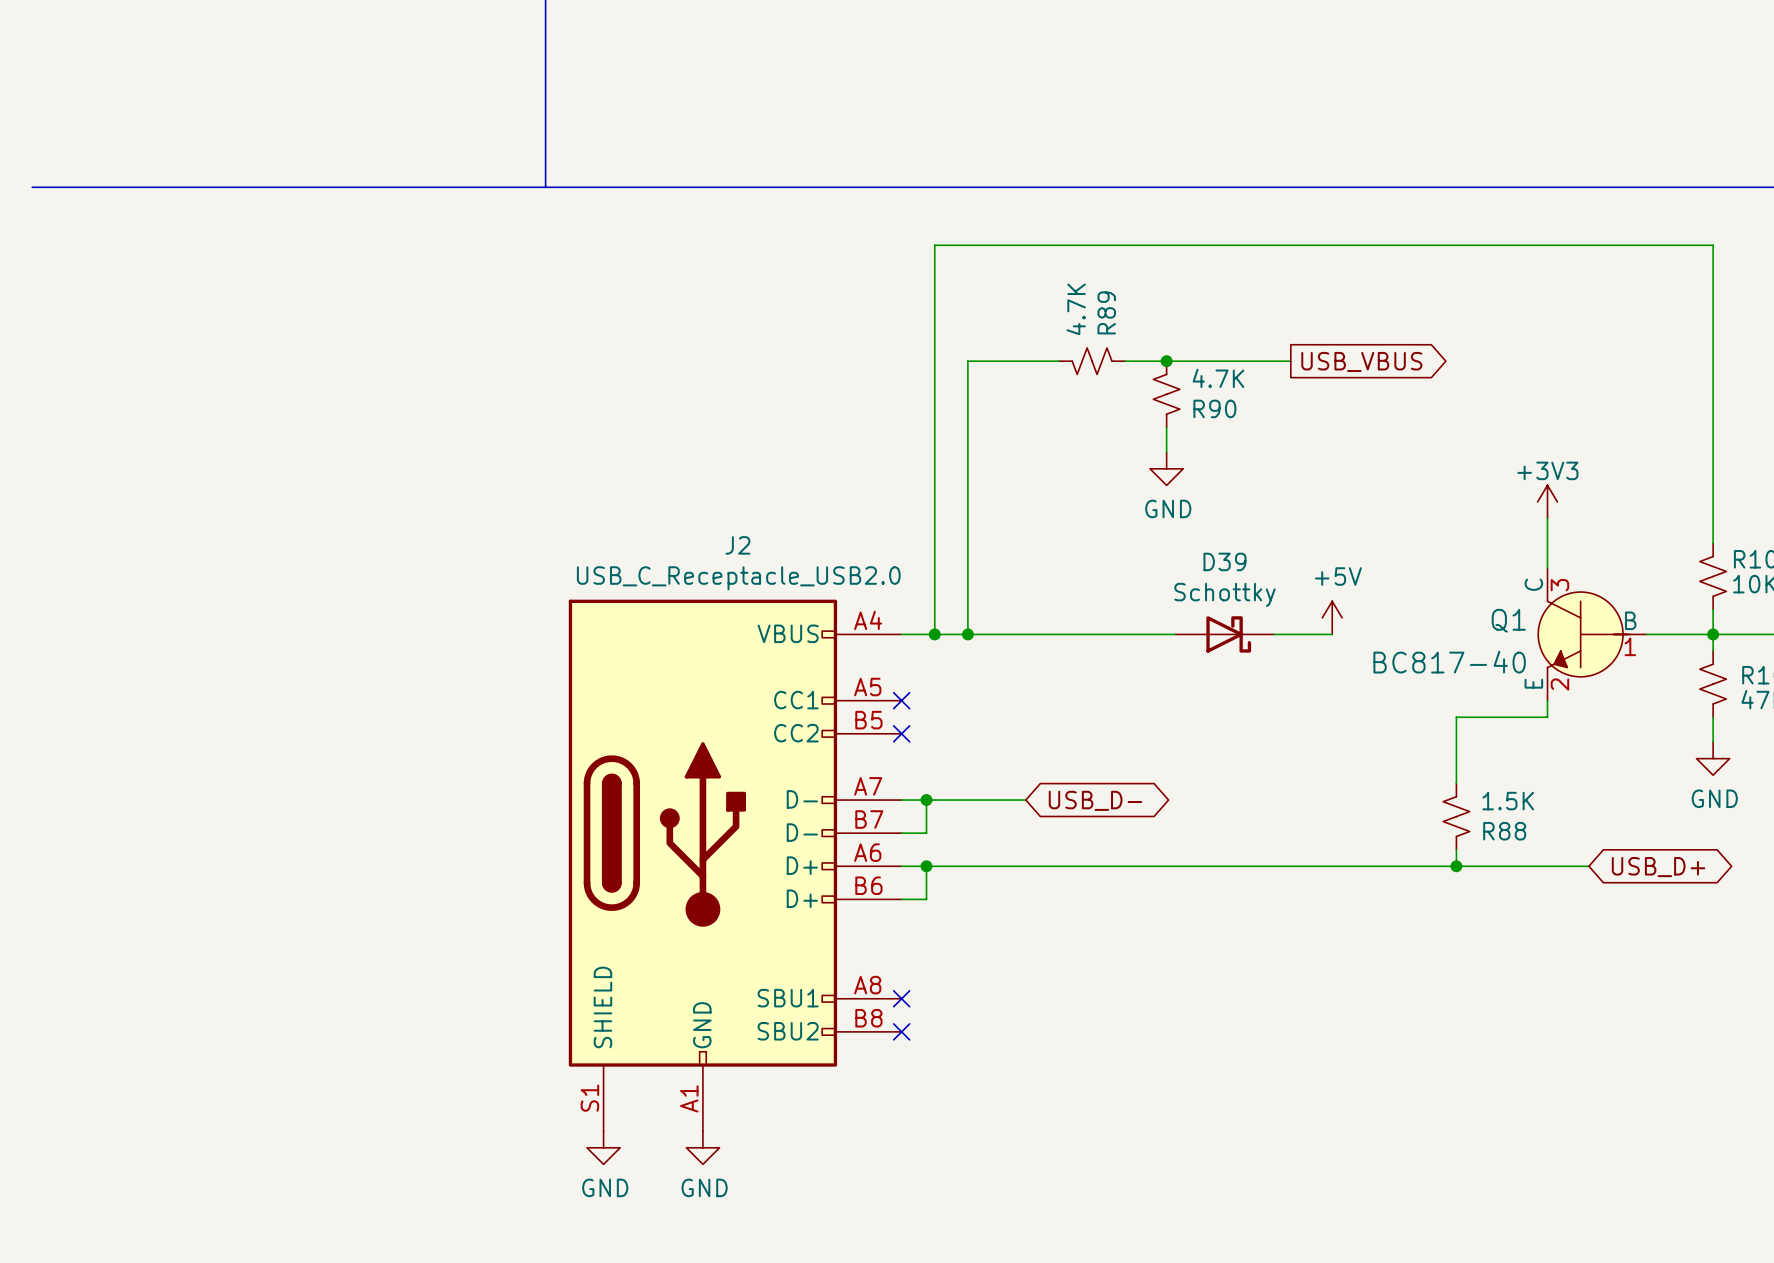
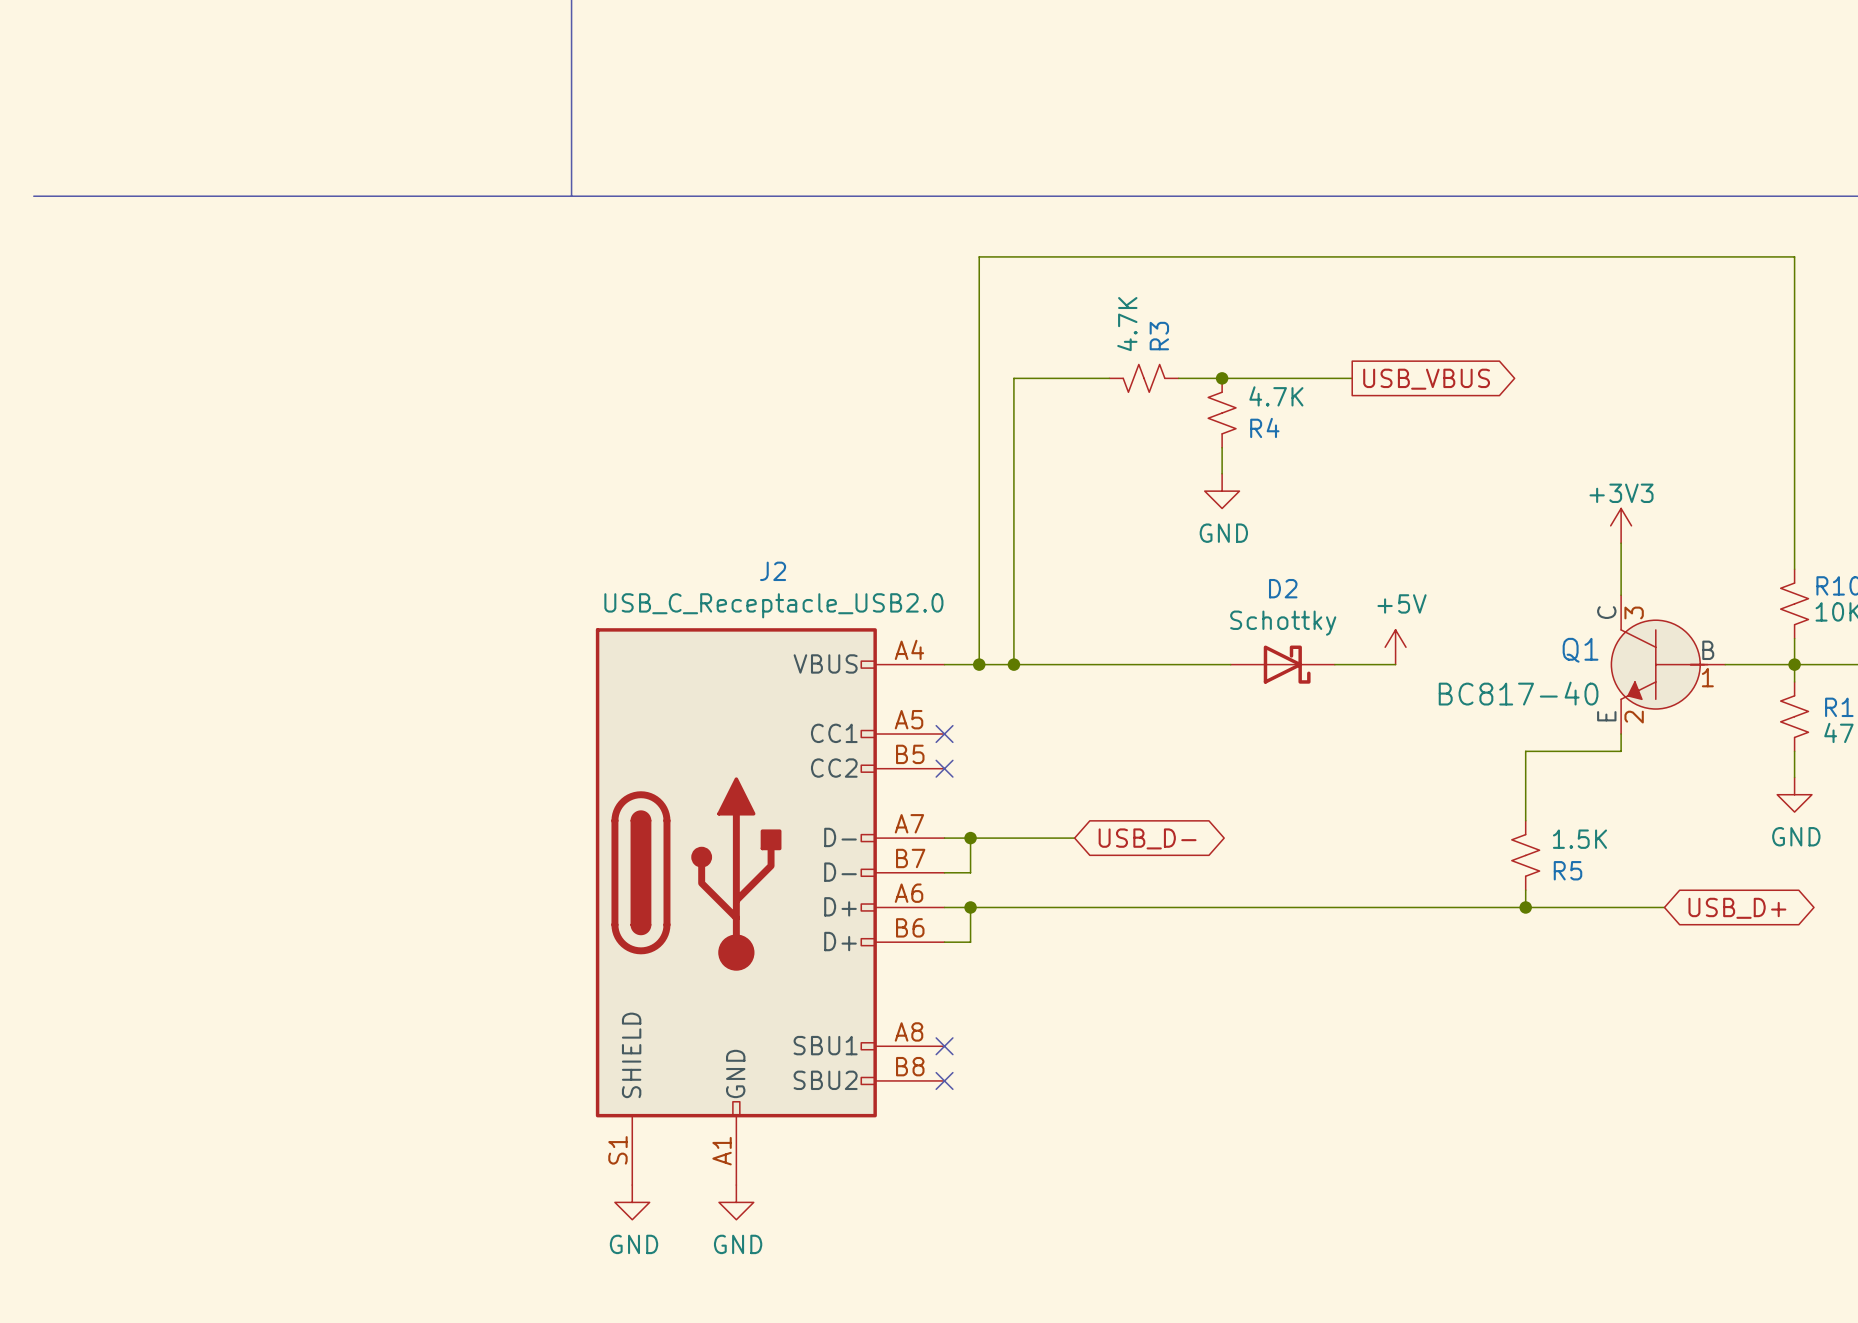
R89 name: R89 (1106, 312) -> R3 (1159, 336)
R90 name: R90 (1214, 408) -> R4 (1264, 427)
D39 name: D39 (1224, 561) -> D2 (1283, 588)
R88 name: R88 (1504, 831) -> R5 (1568, 870)

